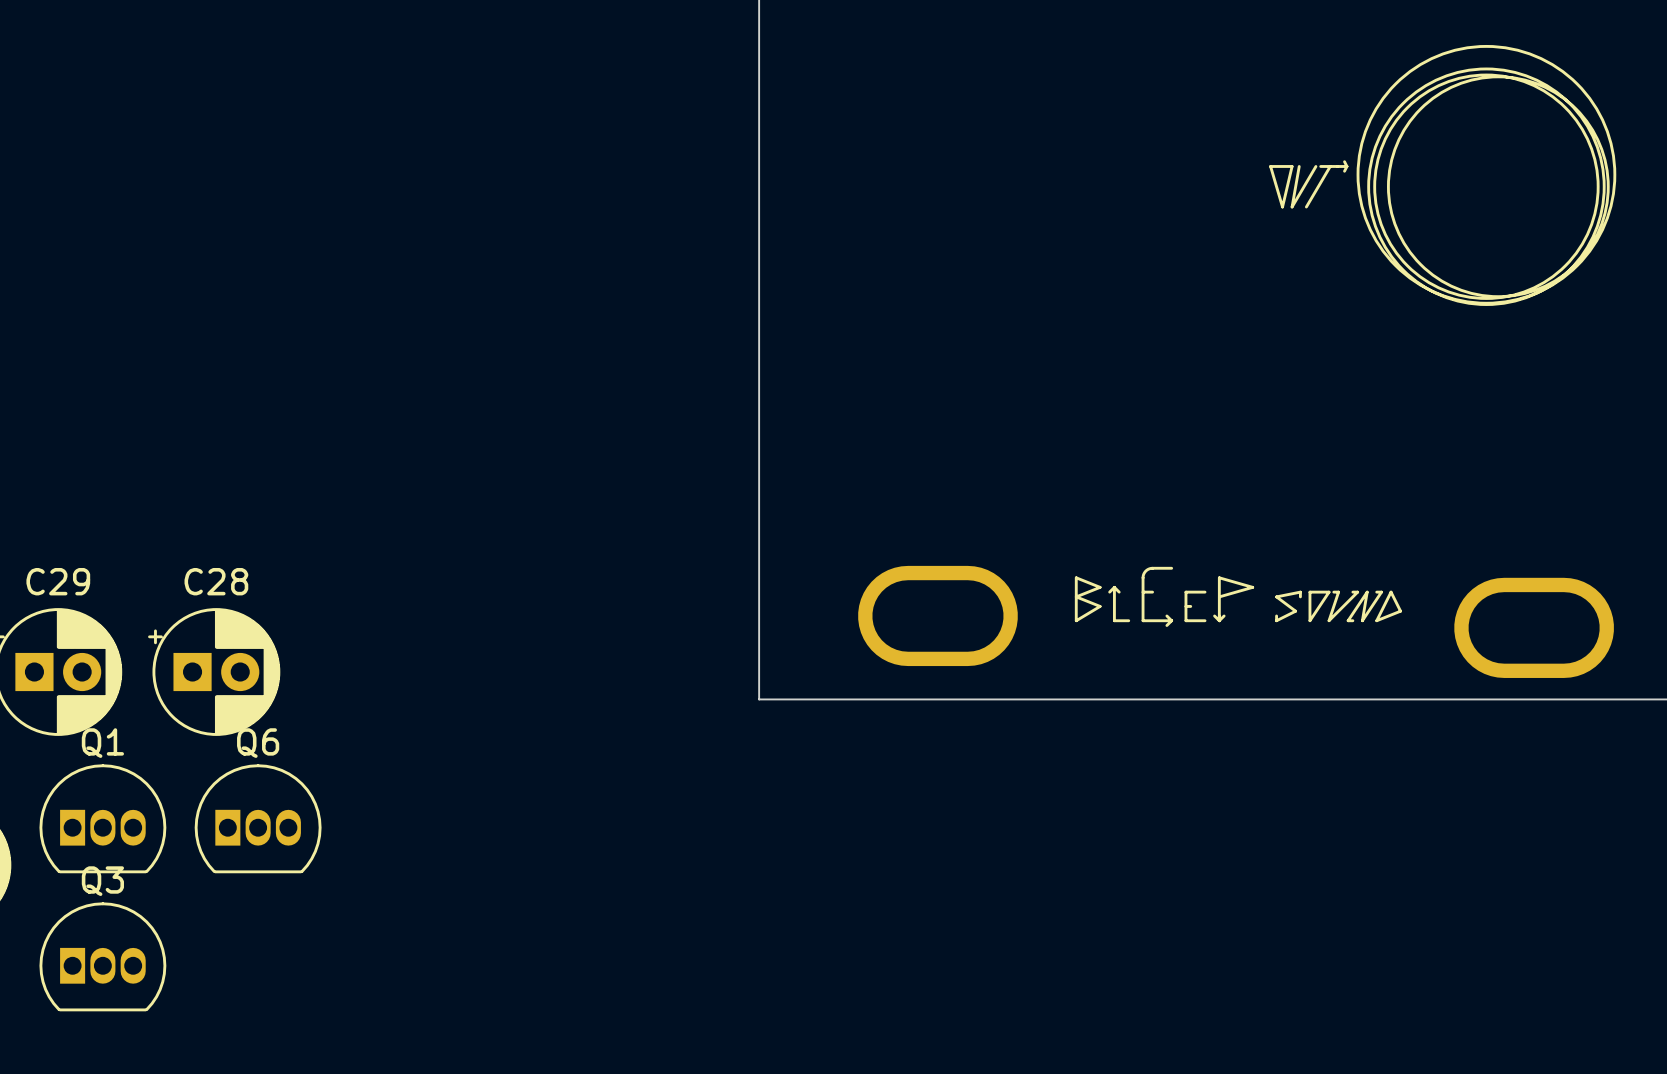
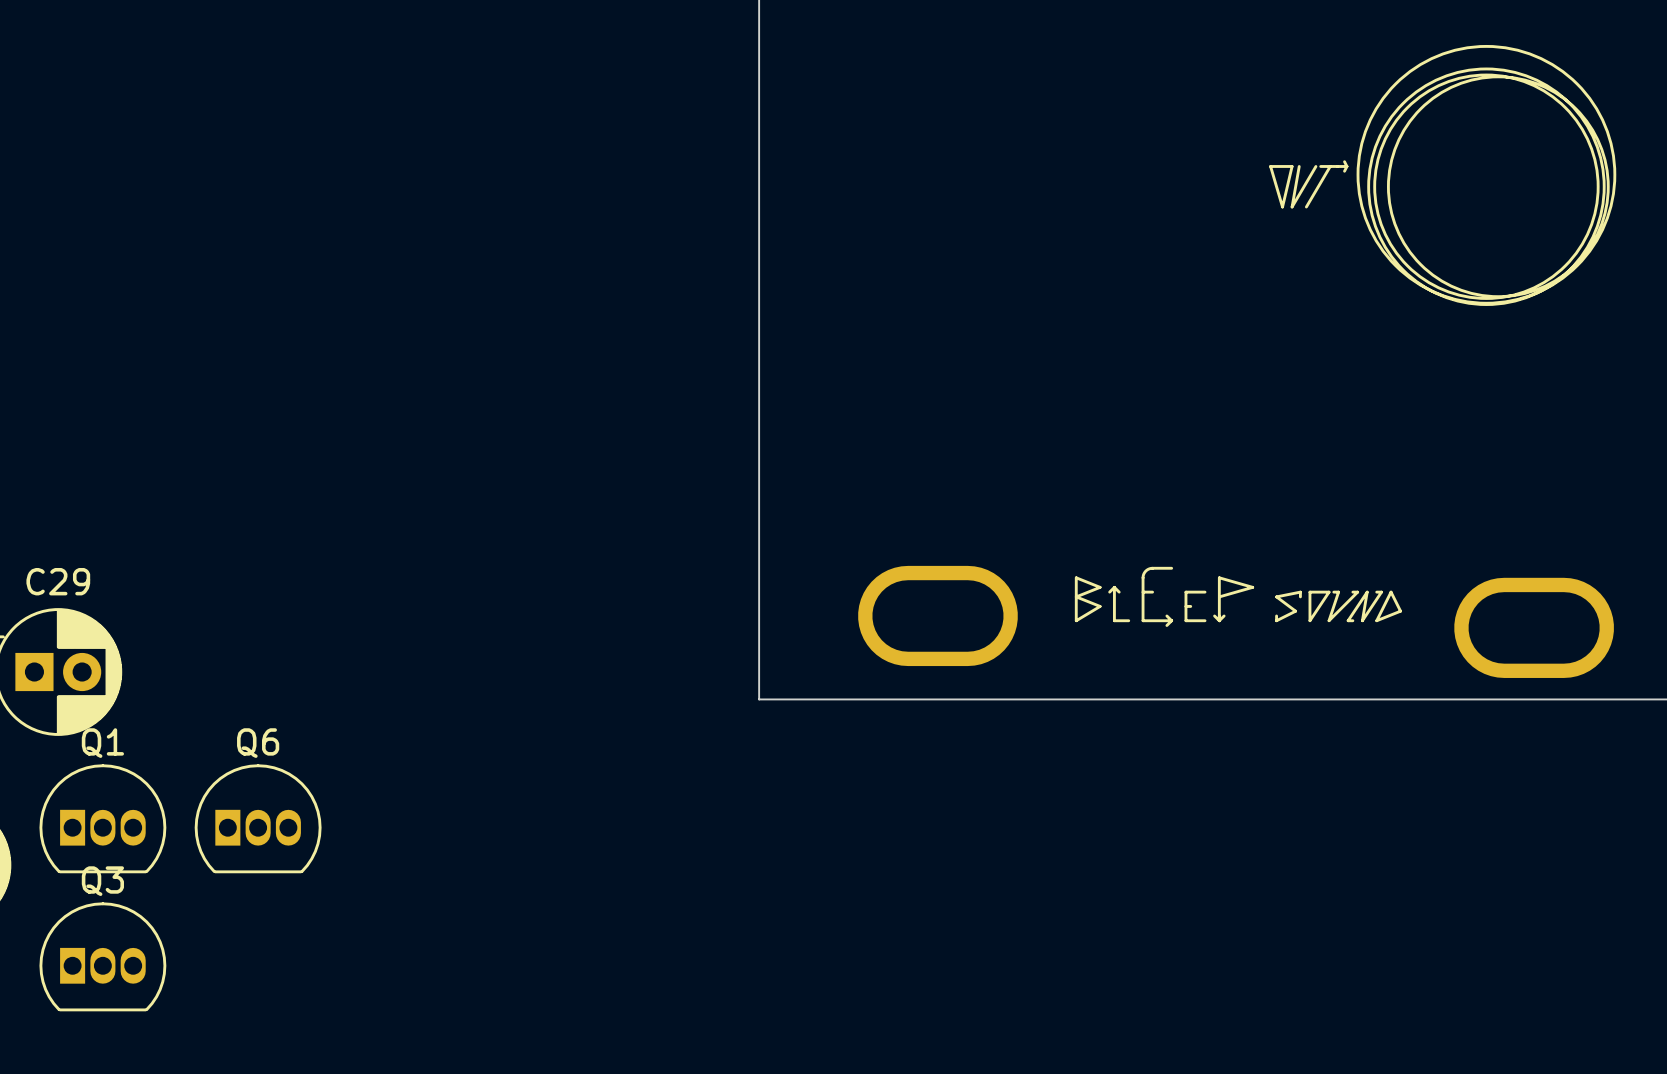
C28: (214, 672) -> none

